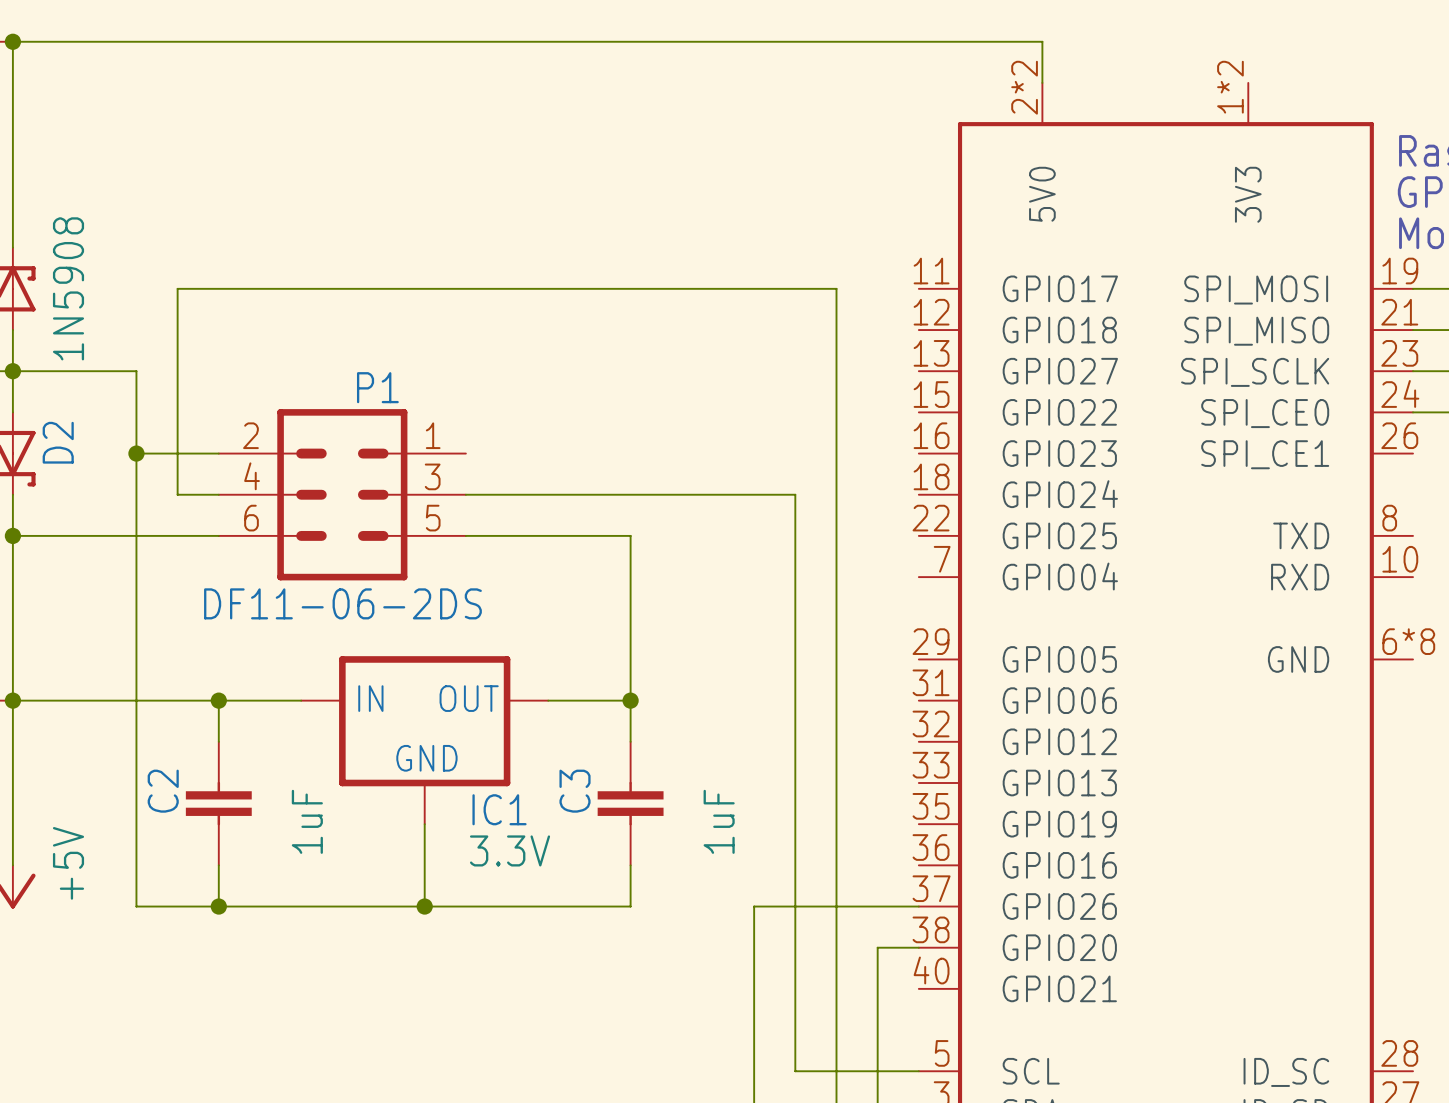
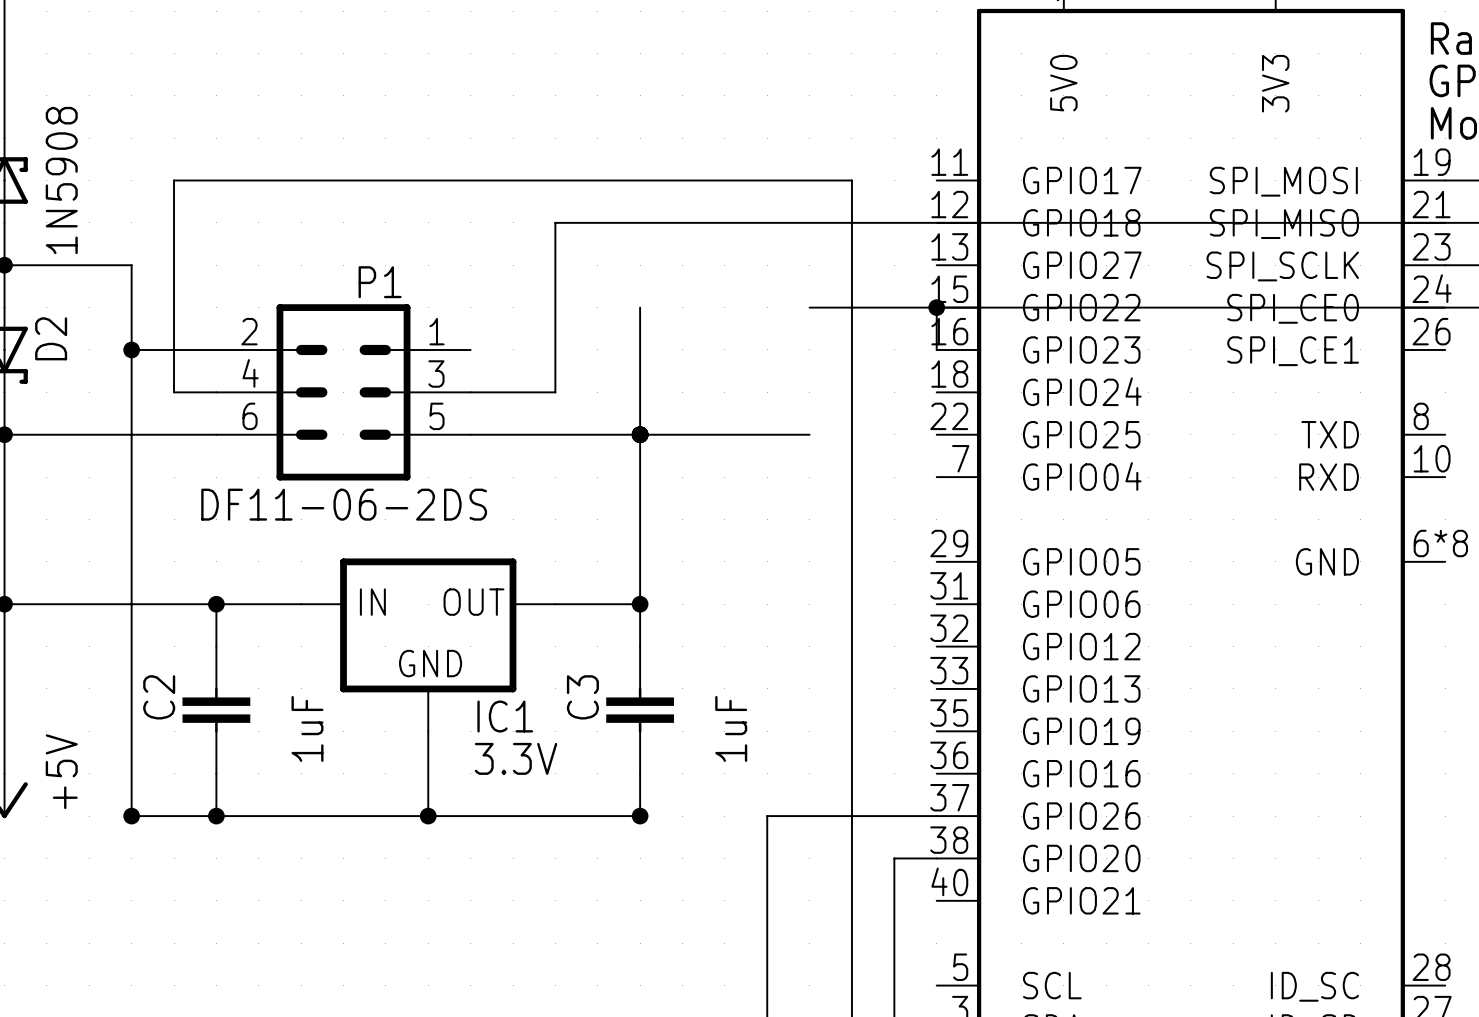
wire: none -> (640, 307) (640, 434) (809, 434)
wire: none -> (809, 307) (1445, 307)
wire: none -> (936, 307) (936, 349)
junction: none -> (936, 307)
wire: (548, 494) (795, 494) (795, 1071) (918, 1071) -> (555, 392) (555, 222) (1445, 222)
junction: none -> (640, 434)
junction: none -> (131, 816)
junction: none -> (640, 816)

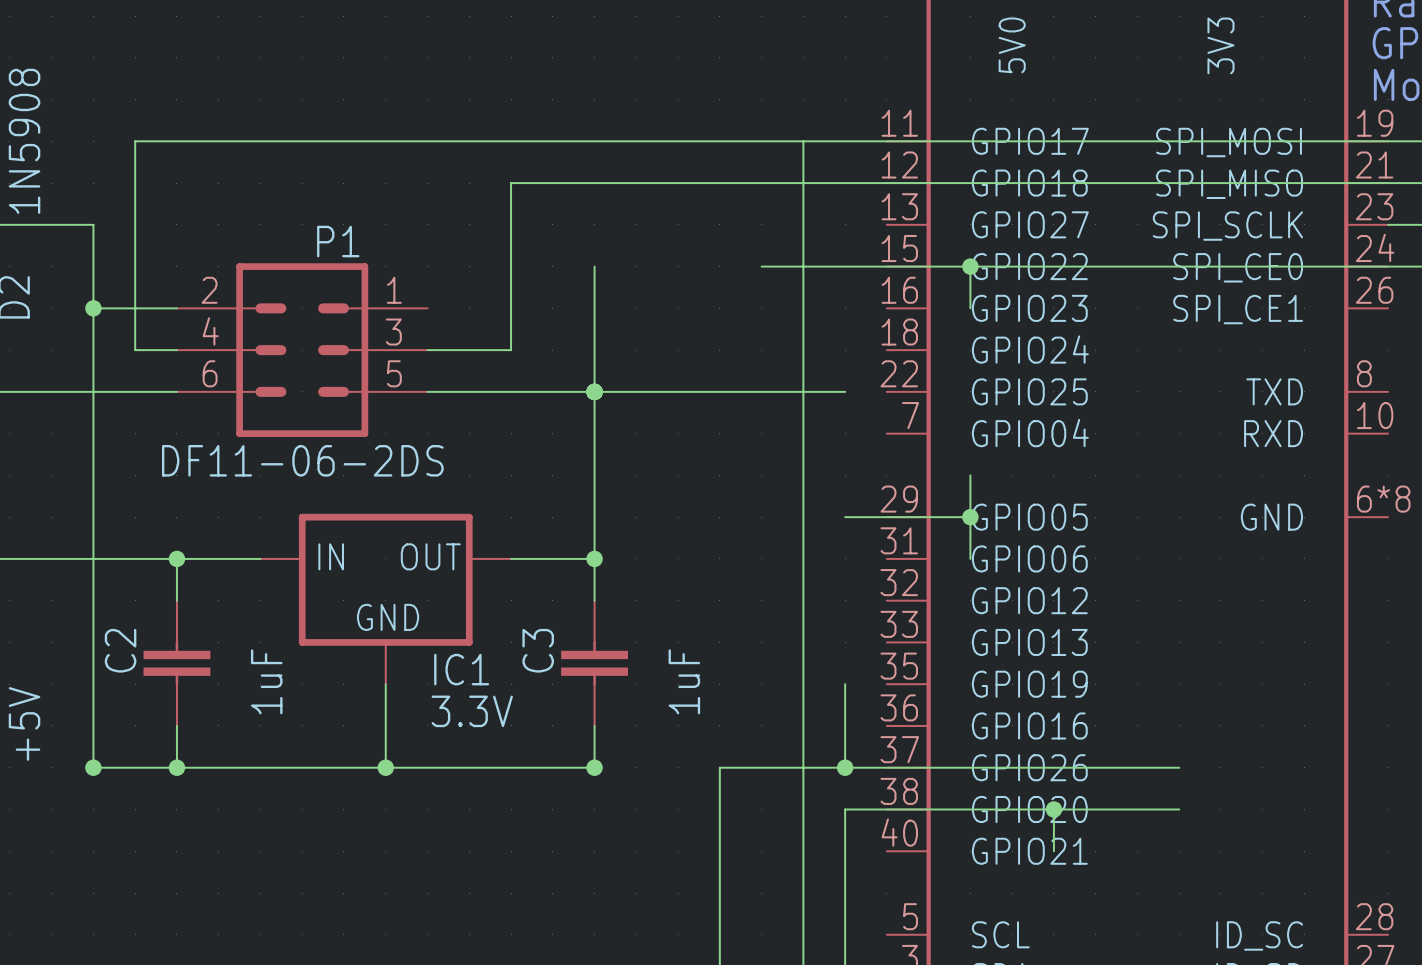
wire: none -> (803, 141) (1388, 141)
wire: (936, 307) (936, 349) -> (970, 266) (970, 308)
junction position: (936, 307) -> (970, 266)
wire: none -> (761, 391) (845, 391)
wire: none -> (970, 475) (970, 558)
wire: none -> (845, 517) (970, 517)
junction: none -> (970, 517)
wire: none -> (845, 684) (845, 767)
junction: none -> (845, 767)
wire: none -> (886, 767) (1179, 767)
wire: none -> (886, 809) (1179, 809)
wire: none -> (1053, 809) (1053, 851)
junction: none -> (1053, 809)

